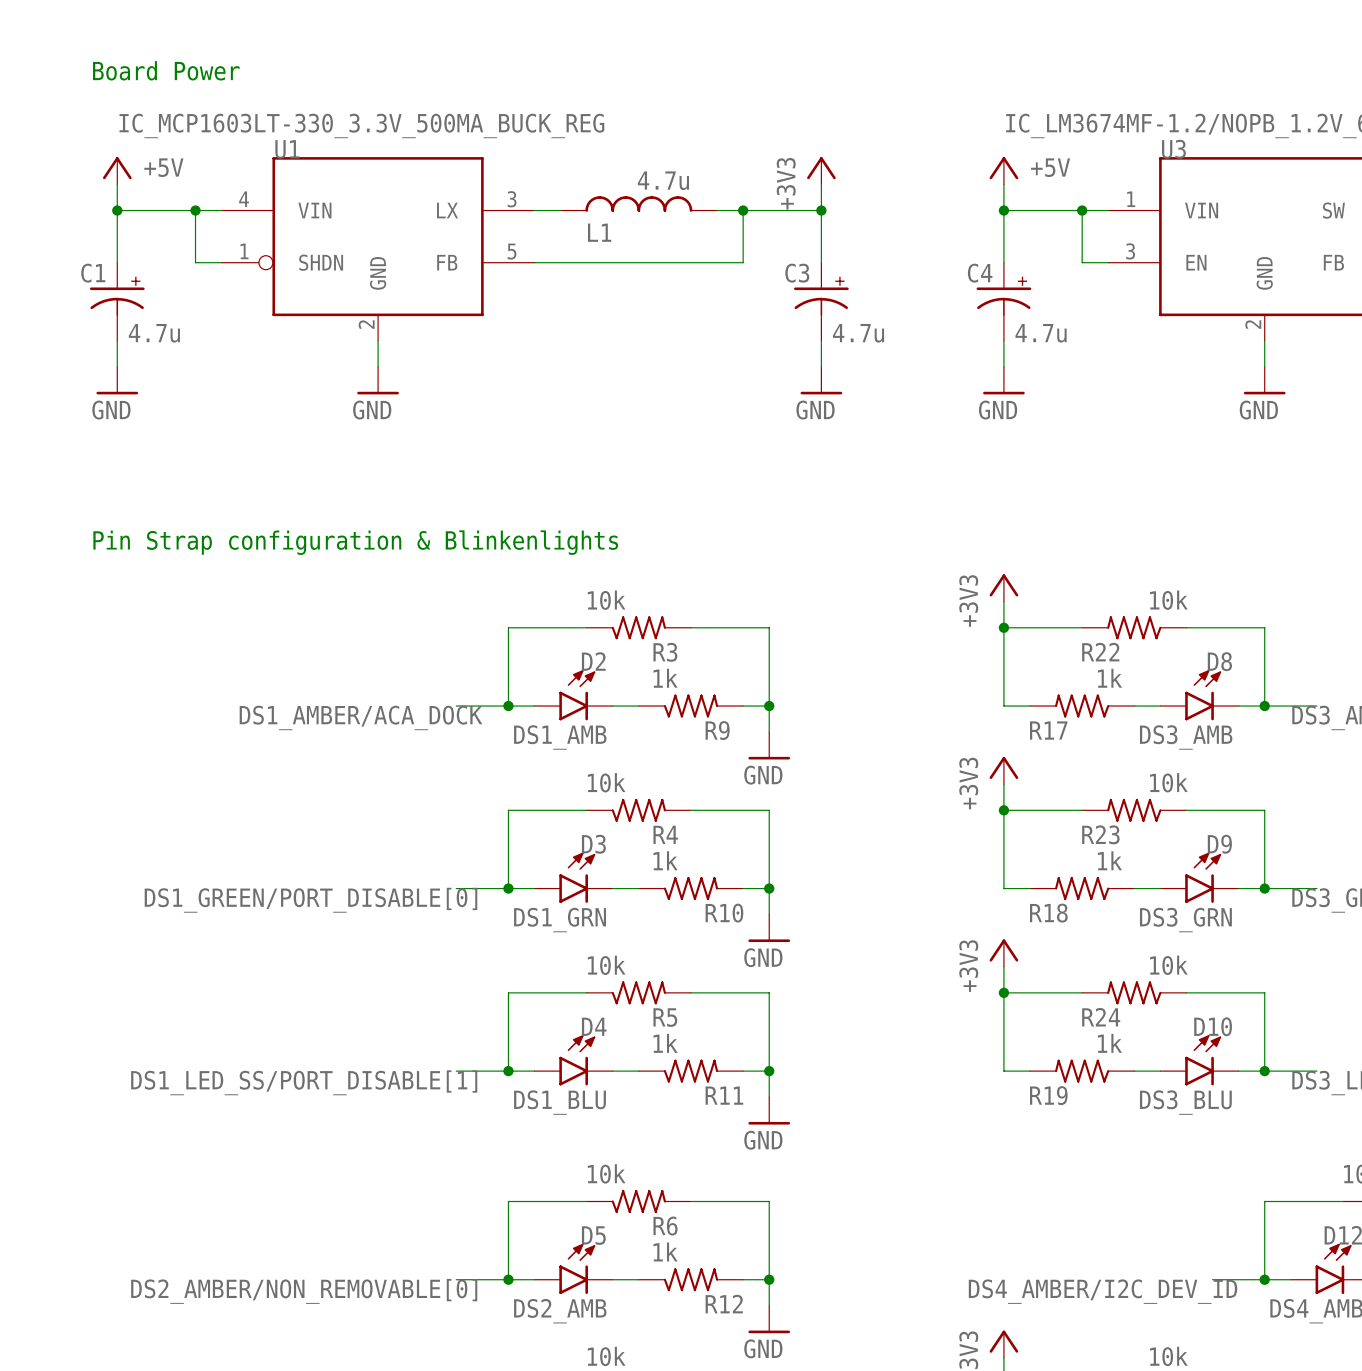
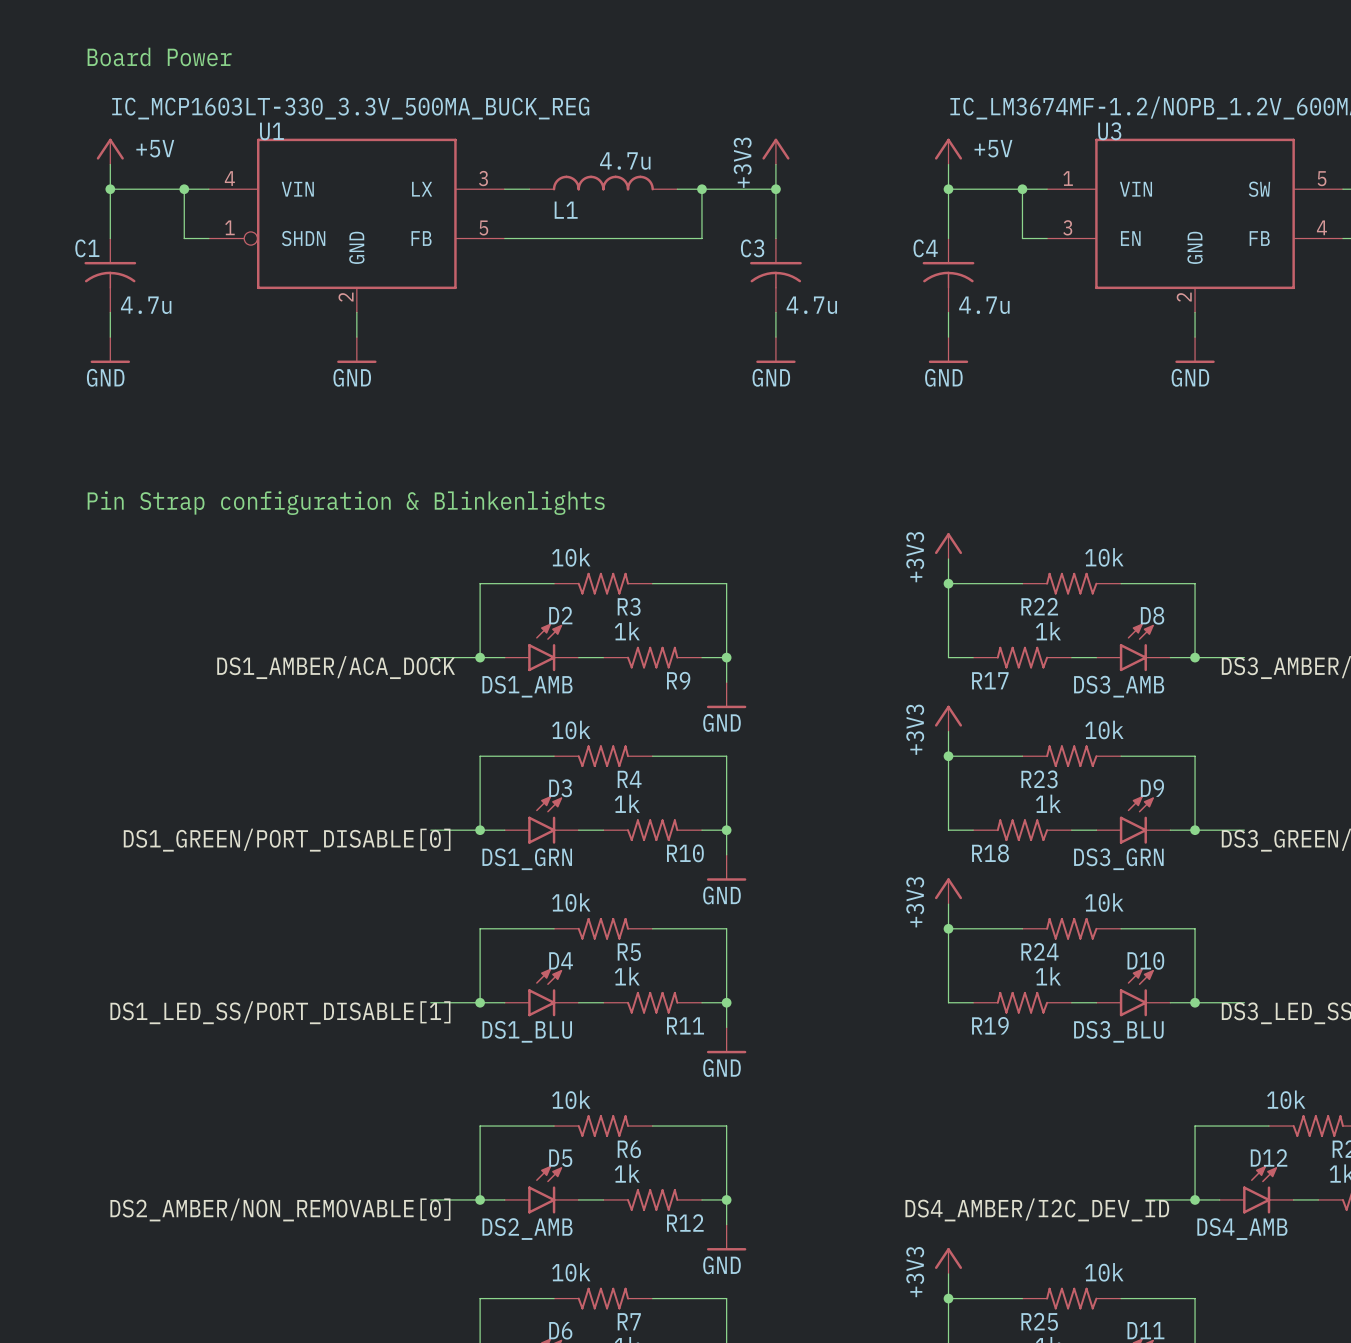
C1 symbol: [89, 262, 145, 341] -> [84, 238, 137, 313]
C3 symbol: [794, 262, 849, 341] -> [750, 238, 802, 313]
C4 symbol: [976, 262, 1032, 341] -> [922, 238, 975, 313]

